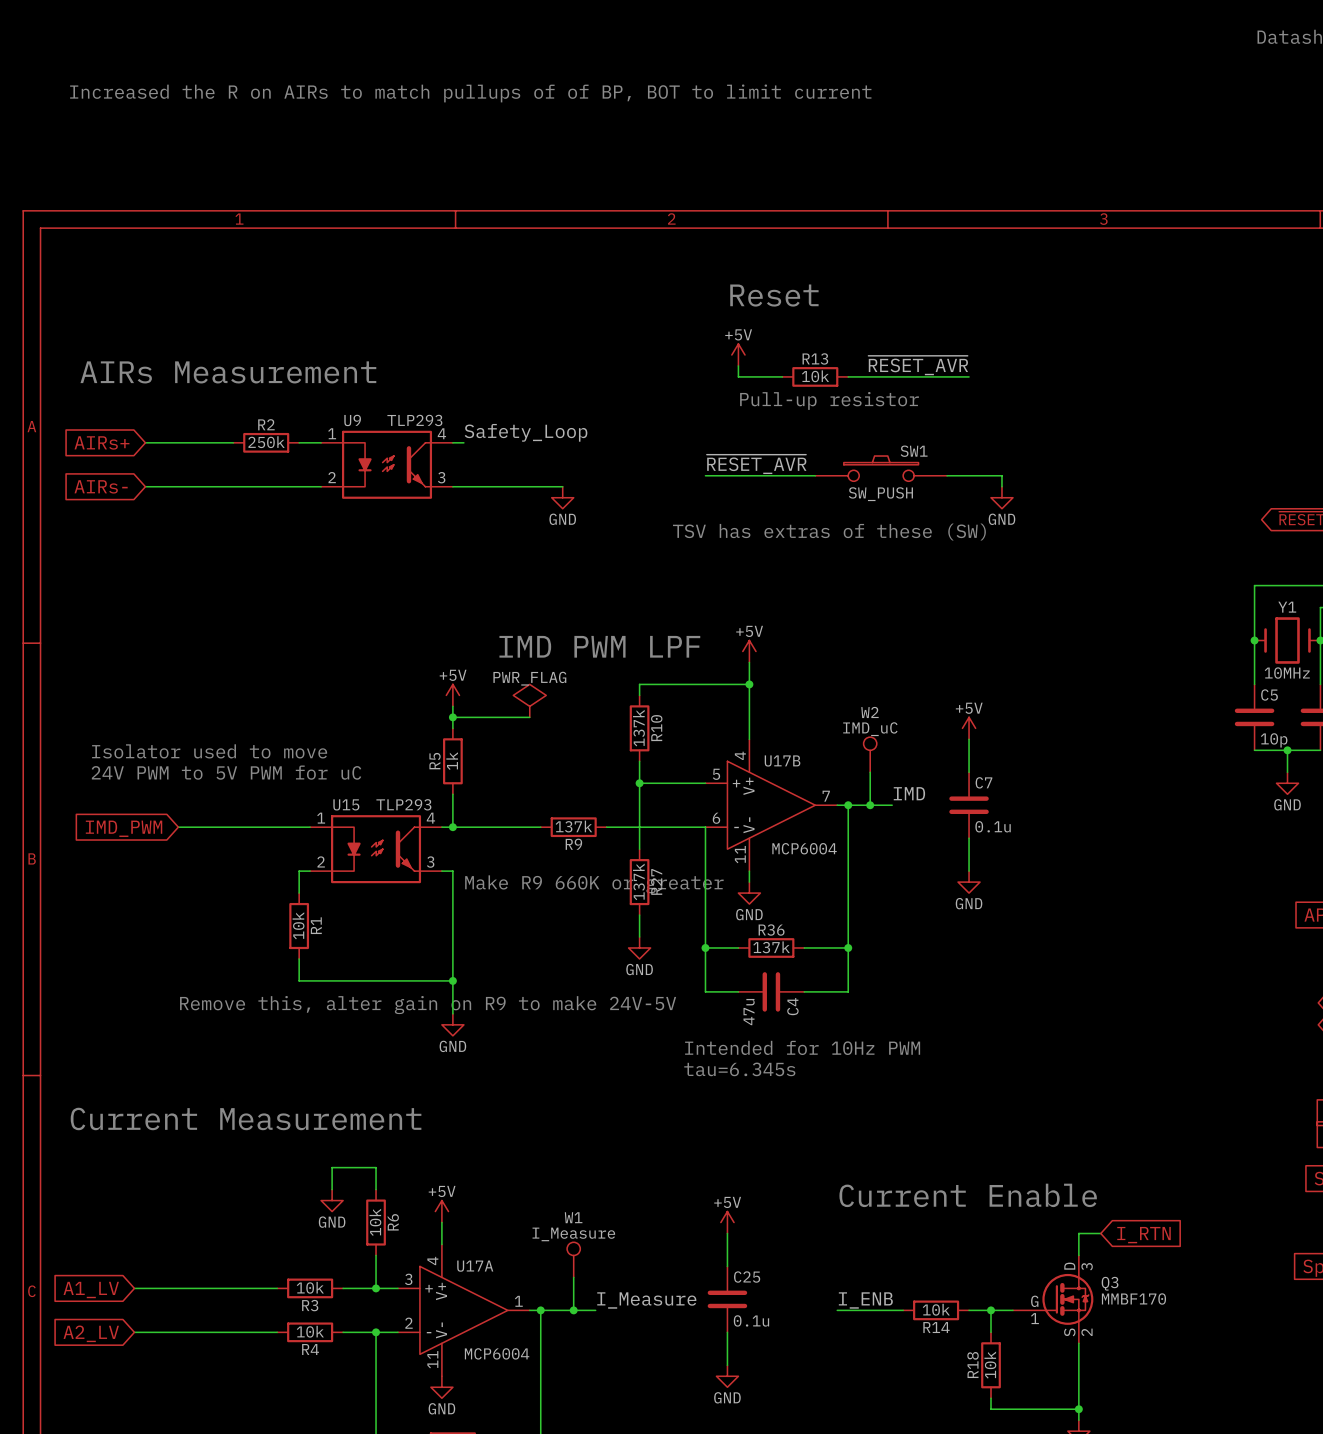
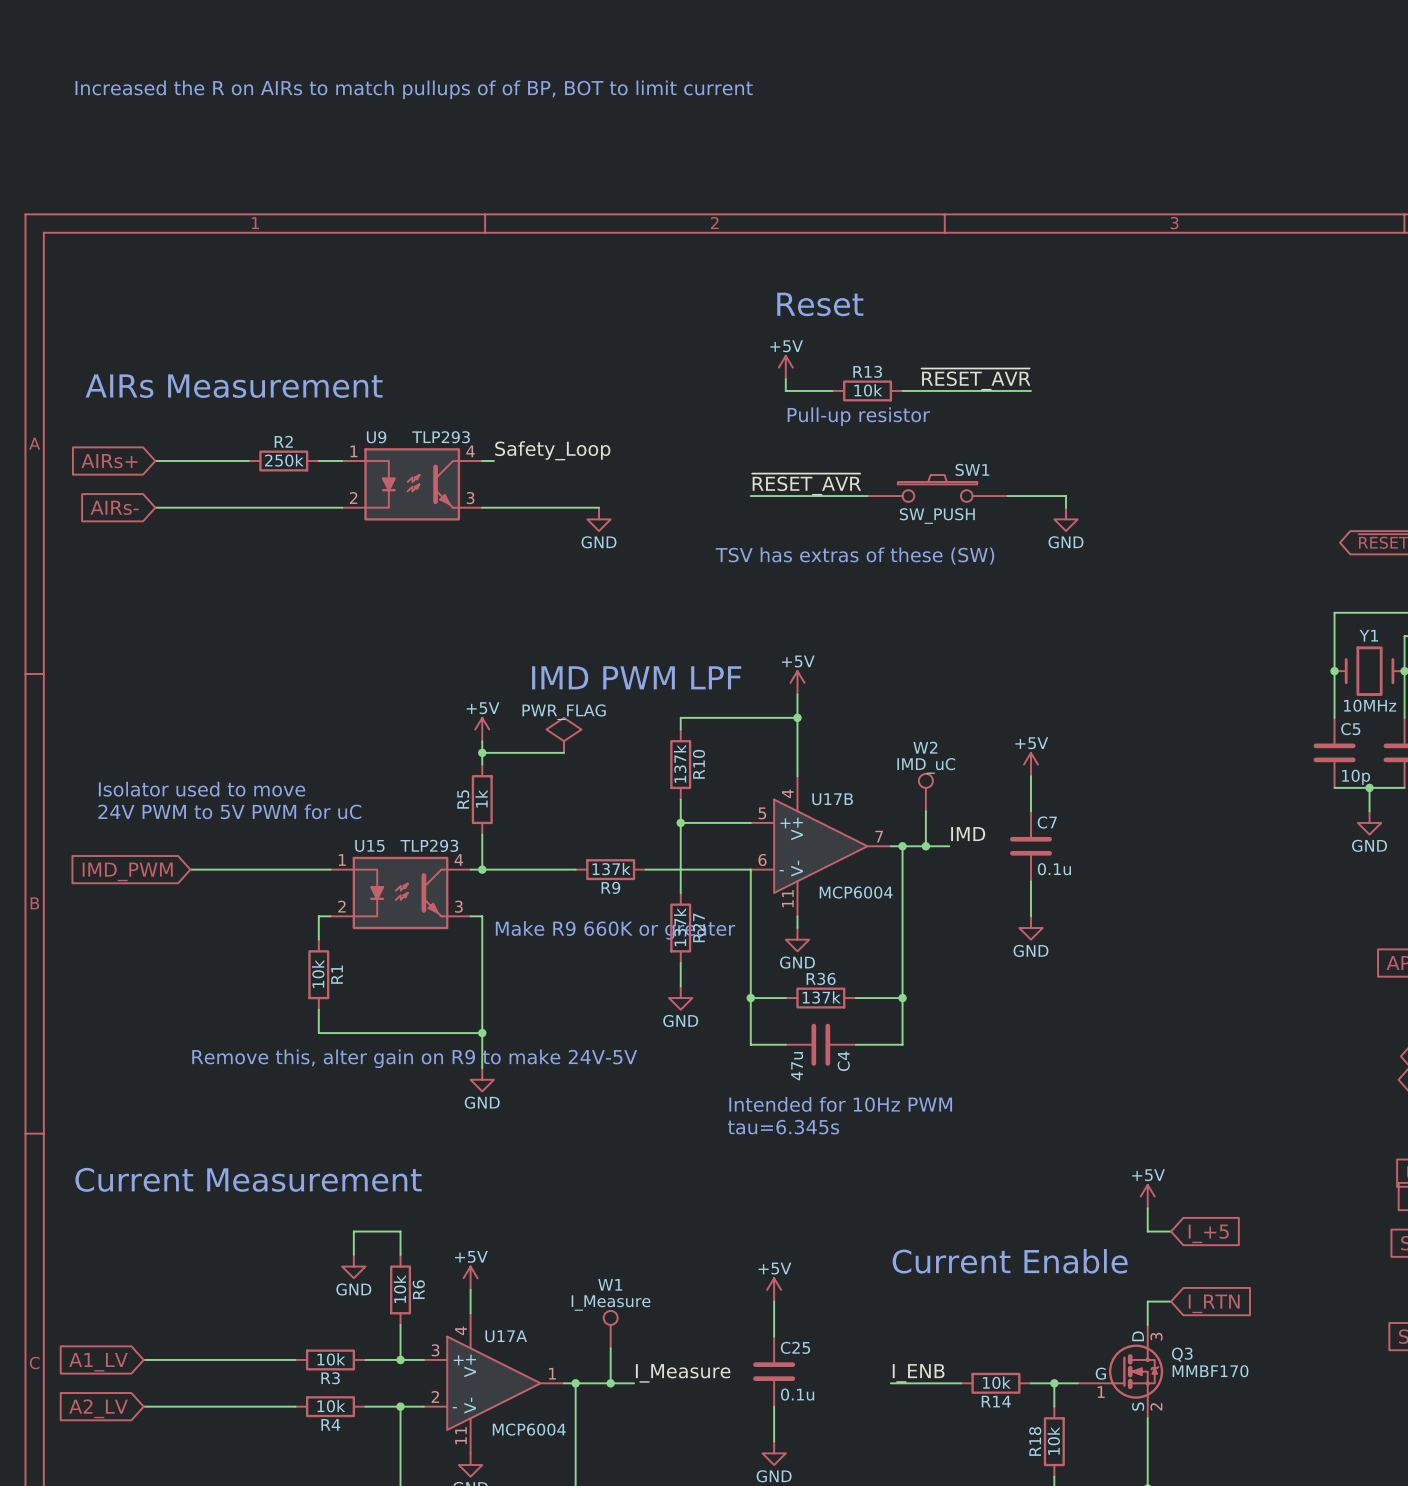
power symbol: none -> +5V (1147, 1196)
wire: none -> (1147, 1208) (1147, 1231) (1171, 1231)
global label: none -> I_+5 (1208, 1233)

